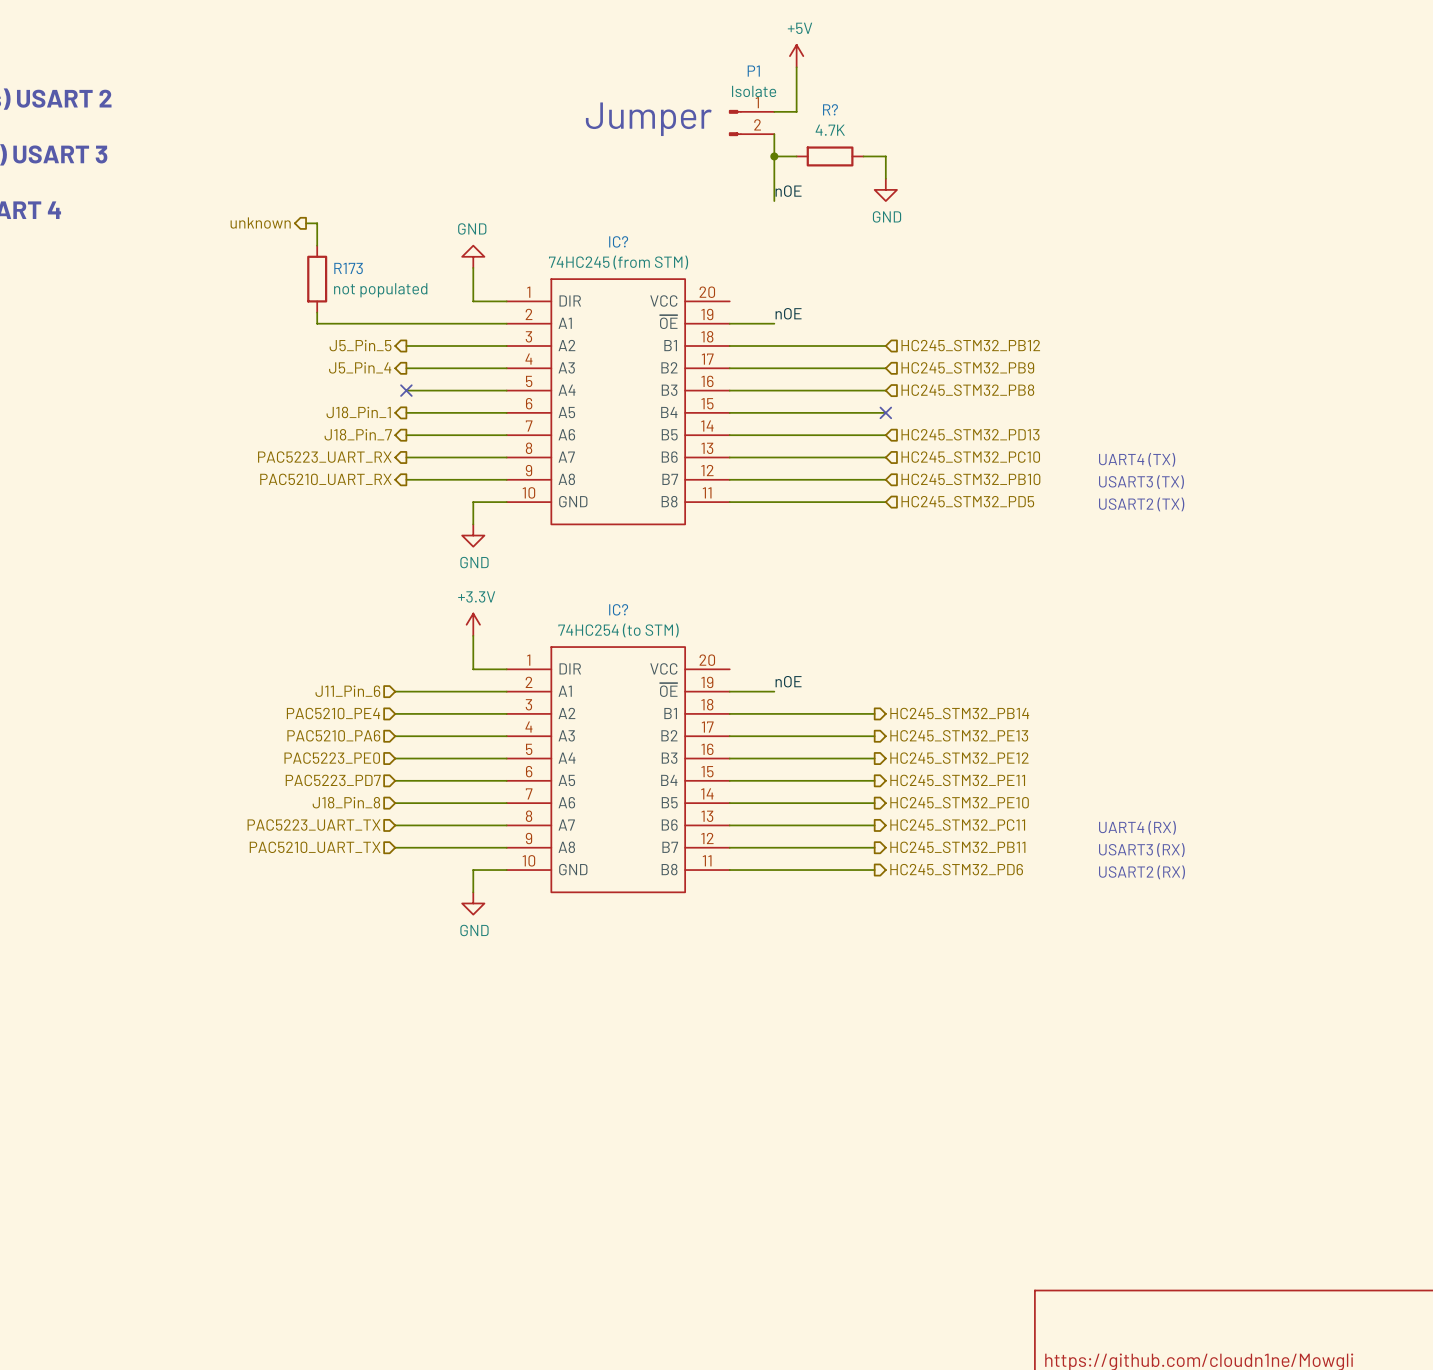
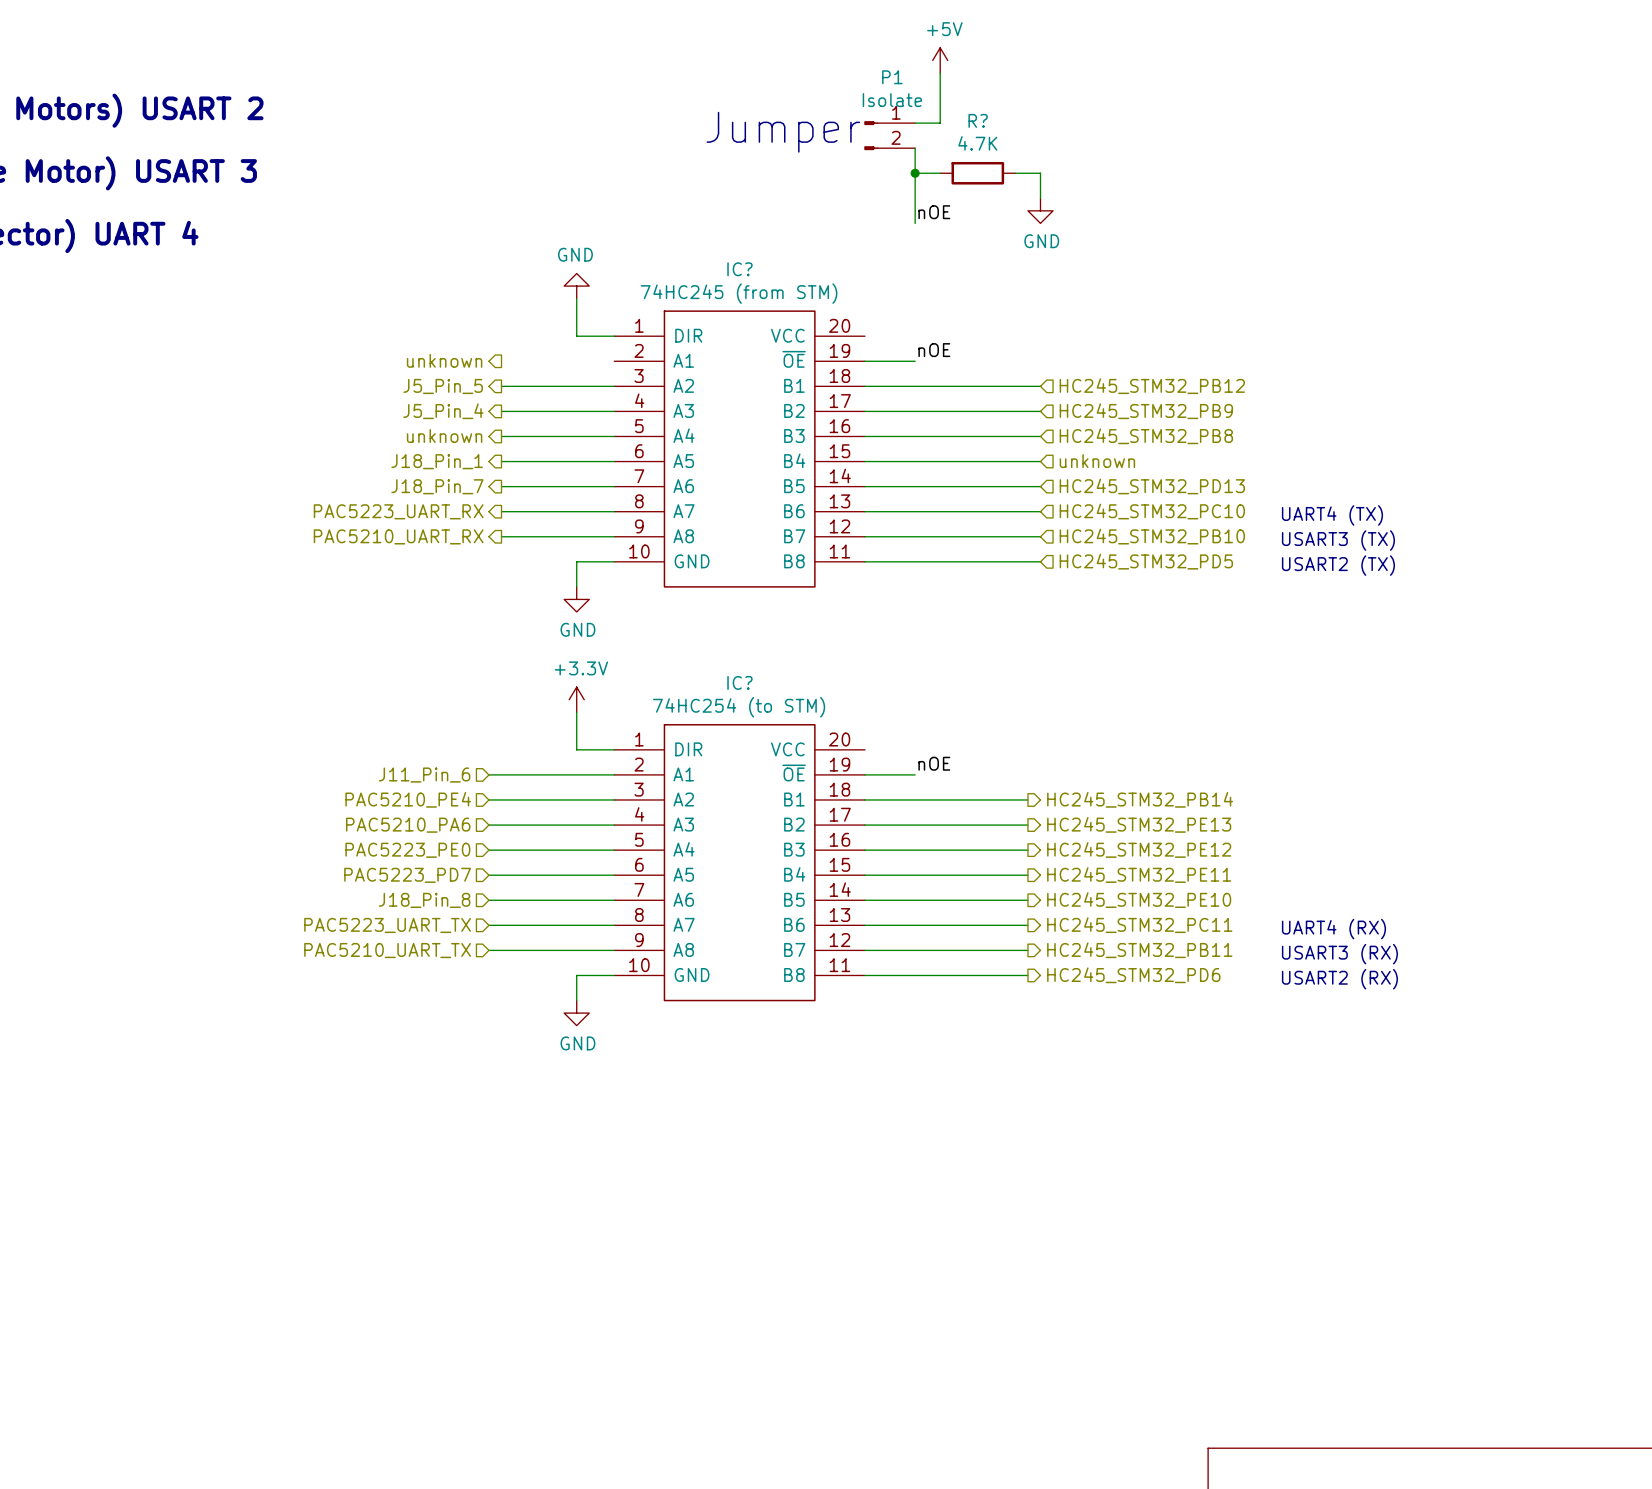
hierarchical label: unknown (260, 223) -> none
wire: (306, 223) (317, 223) (317, 245) -> none
R173: not populated (317, 279) -> none
wire: (317, 312) (317, 323) (506, 323) -> none
hierarchical label: none -> unknown (444, 360)
hierarchical label: none -> unknown (444, 436)
no-connect mark: (406, 390) -> none
no-connect mark: (885, 412) -> none
hierarchical label: none -> unknown (1097, 461)

